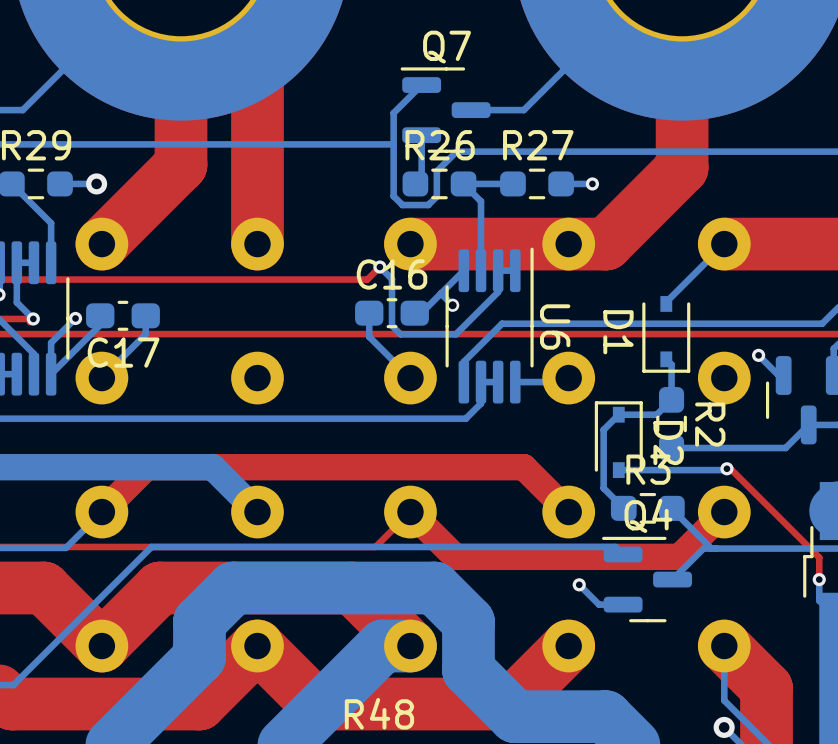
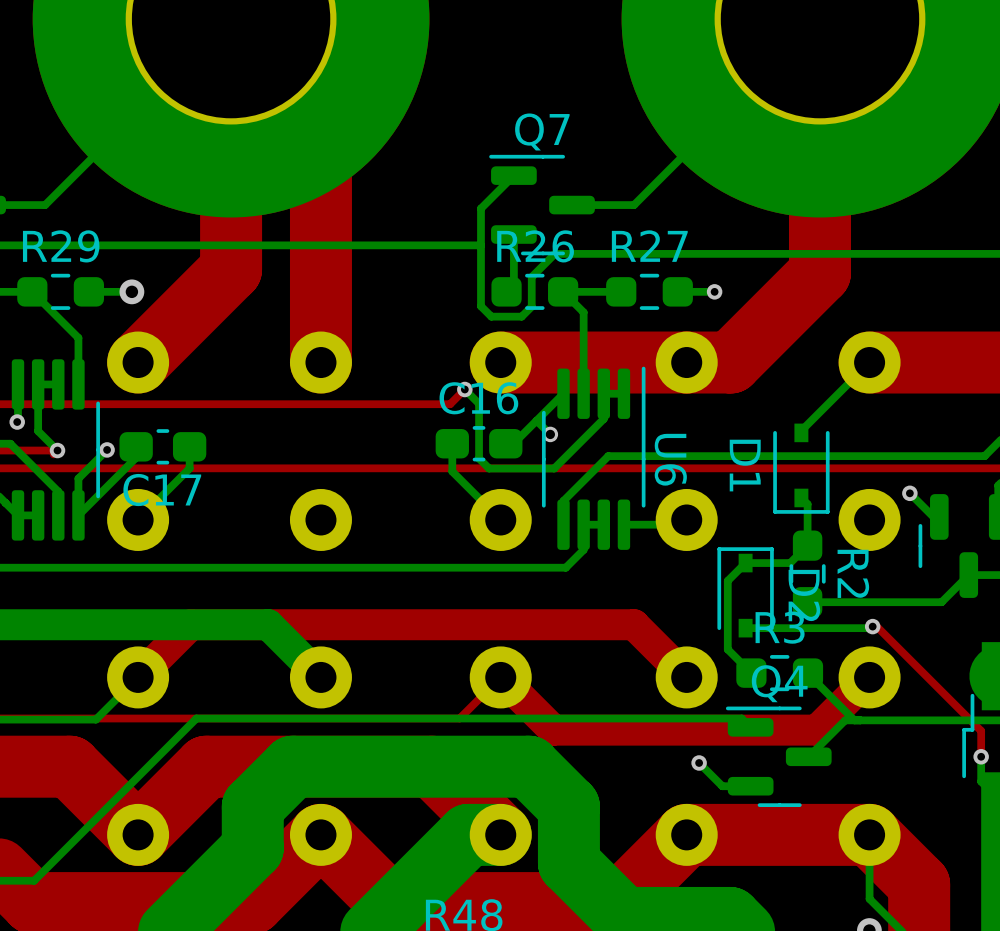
top track: none -> (869, 834) (686, 834)

